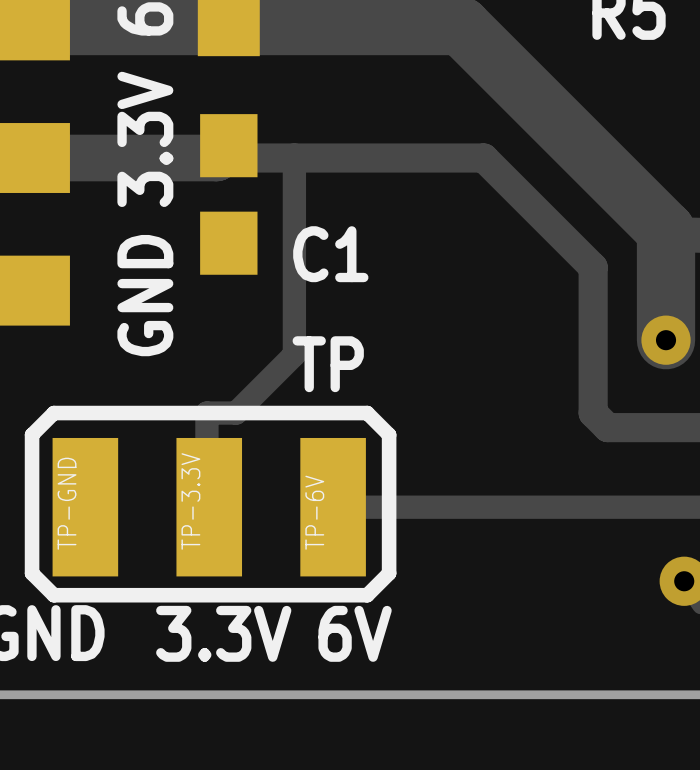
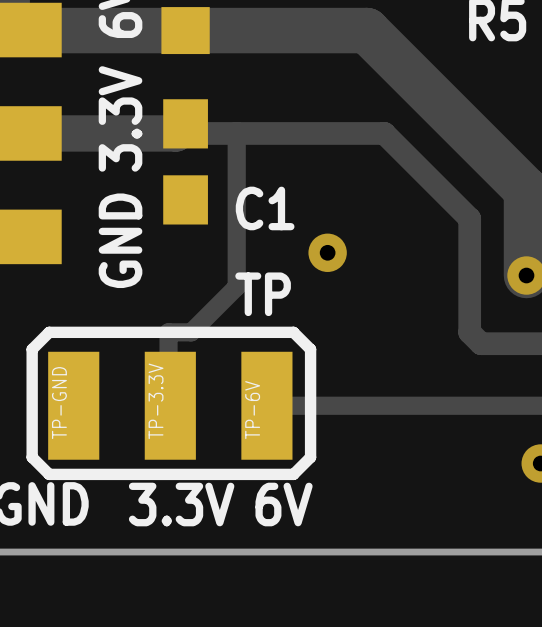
via: none -> (327, 252)

